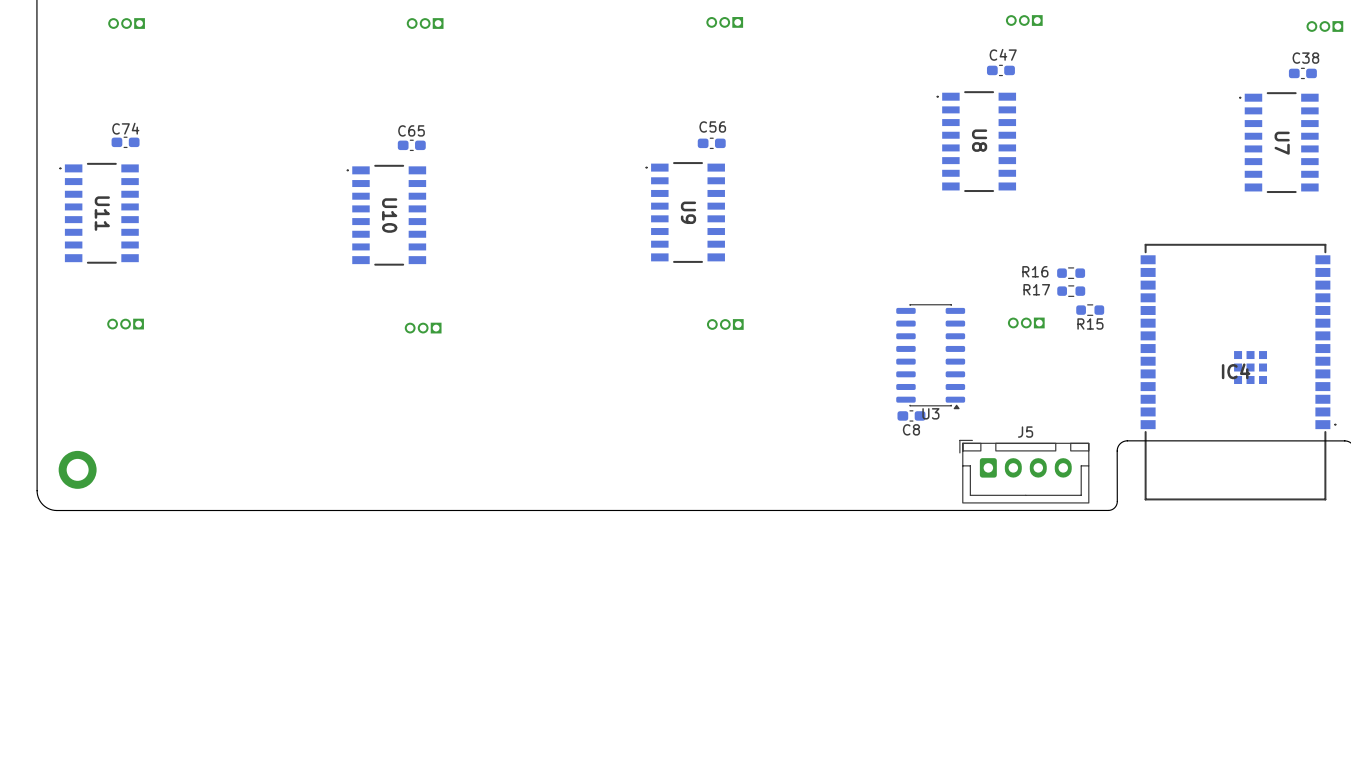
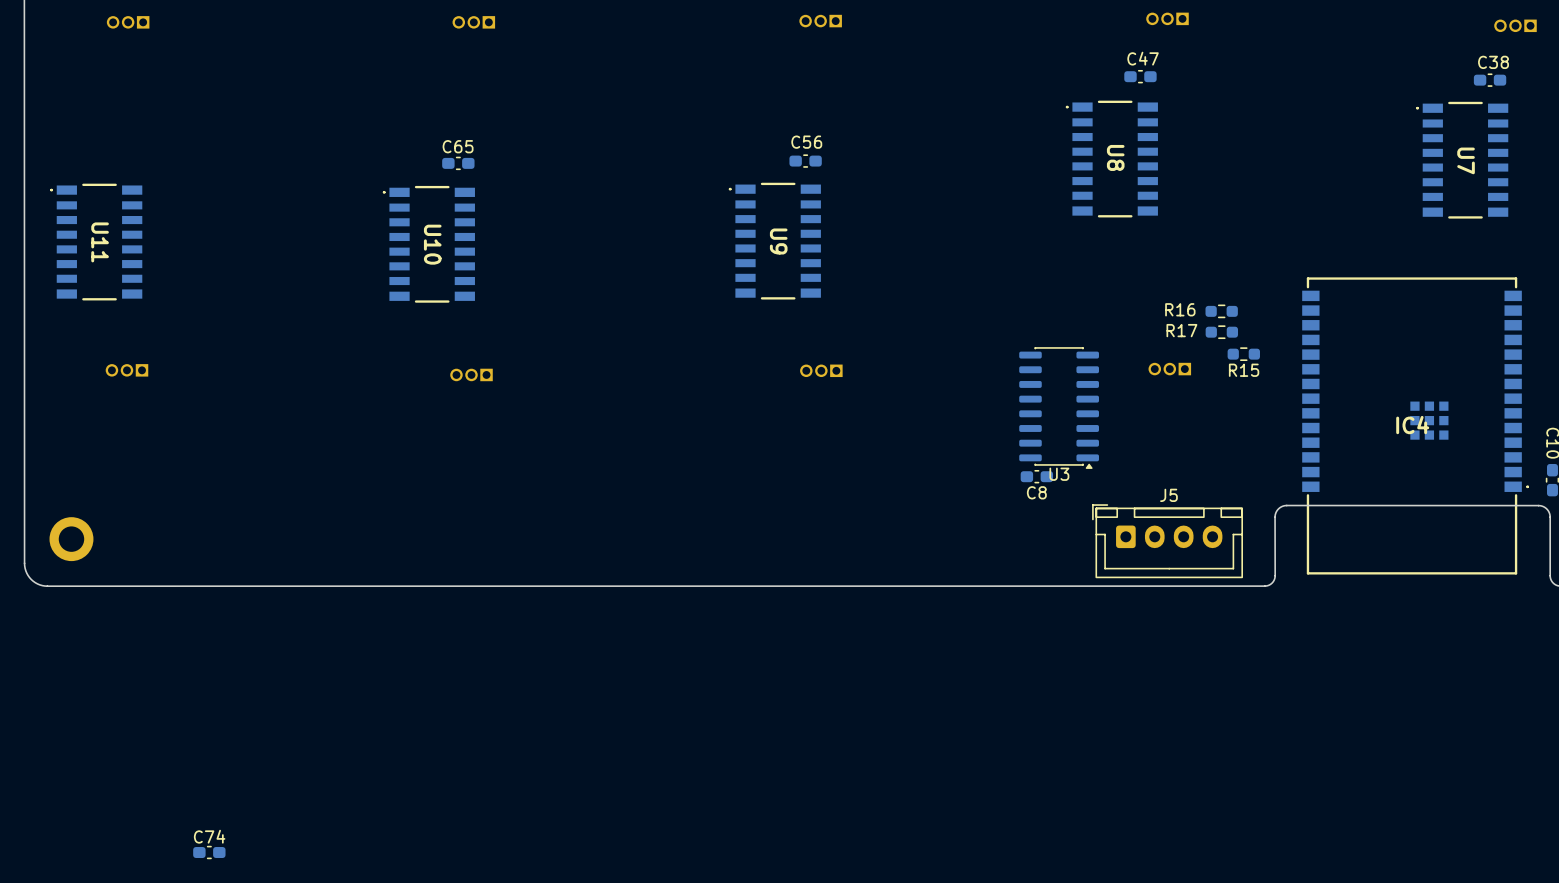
C74 position: (125, 142) -> (209, 852)

